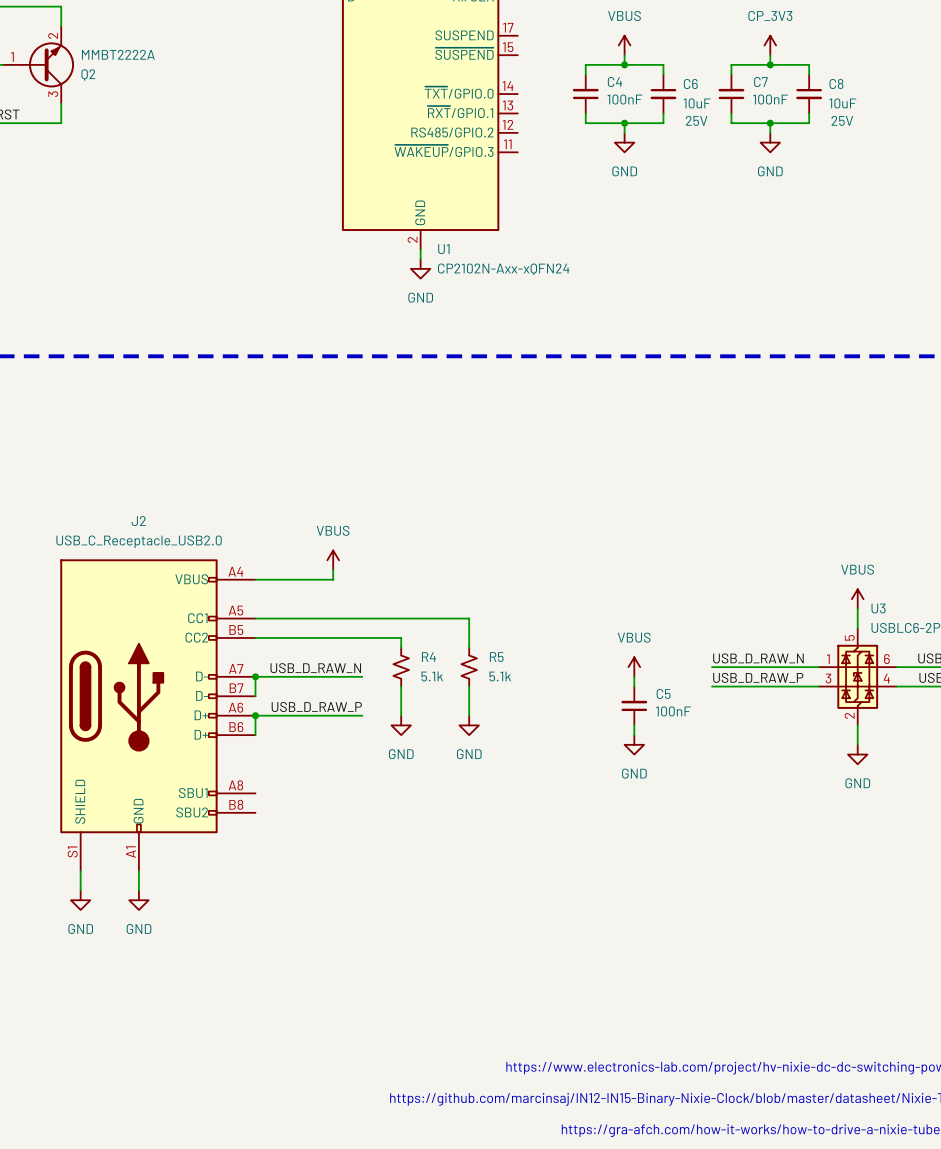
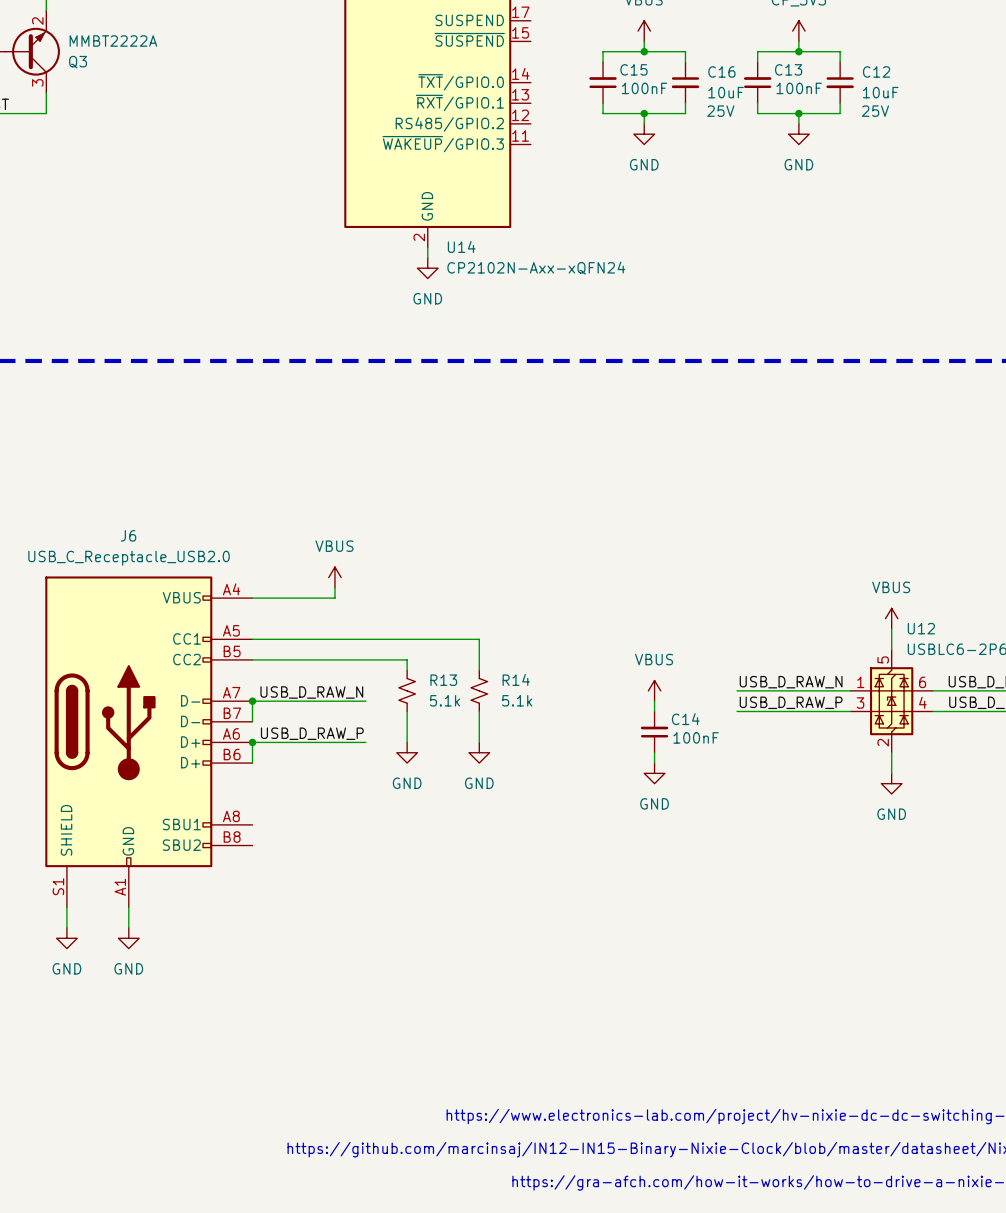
Q2 name: Q2 (88, 74) -> Q3 (78, 62)
C4 name: C4 (614, 82) -> C15 (633, 69)
C7 name: C7 (760, 82) -> C13 (788, 69)
C6 name: C6 (690, 84) -> C16 (721, 71)
C8 name: C8 (836, 84) -> C12 (876, 71)
U1 name: U1 (443, 249) -> U14 (461, 246)
J2 name: J2 (138, 521) -> J6 (128, 535)
U3 name: U3 (878, 608) -> U12 (921, 628)
R4 name: R4 (428, 657) -> R13 (443, 680)
R5 name: R5 (496, 657) -> R14 (516, 679)
C5 name: C5 (663, 693) -> C14 (685, 719)

